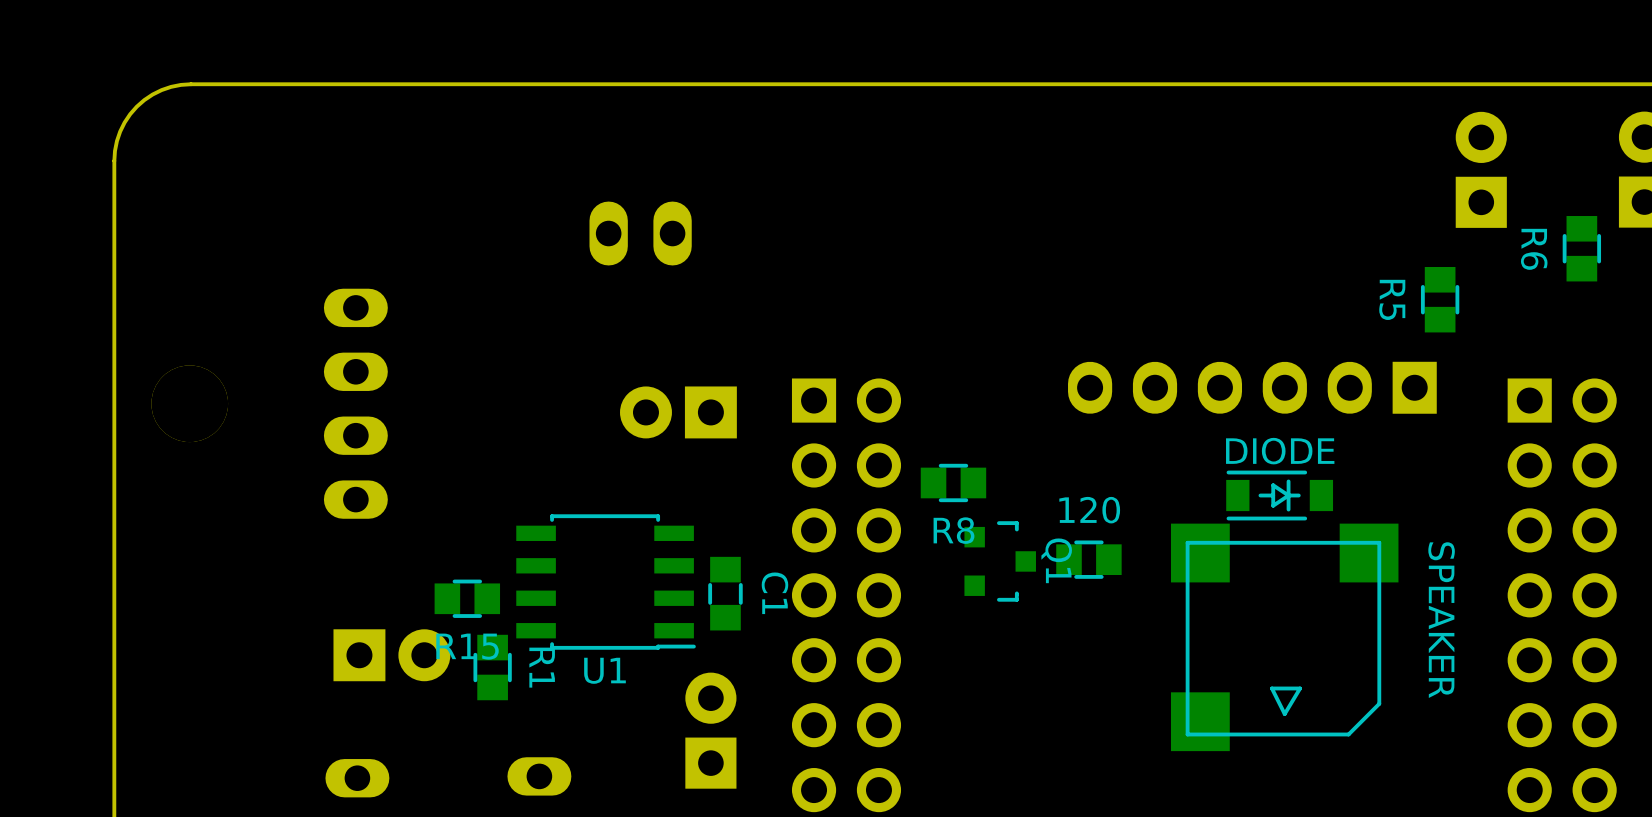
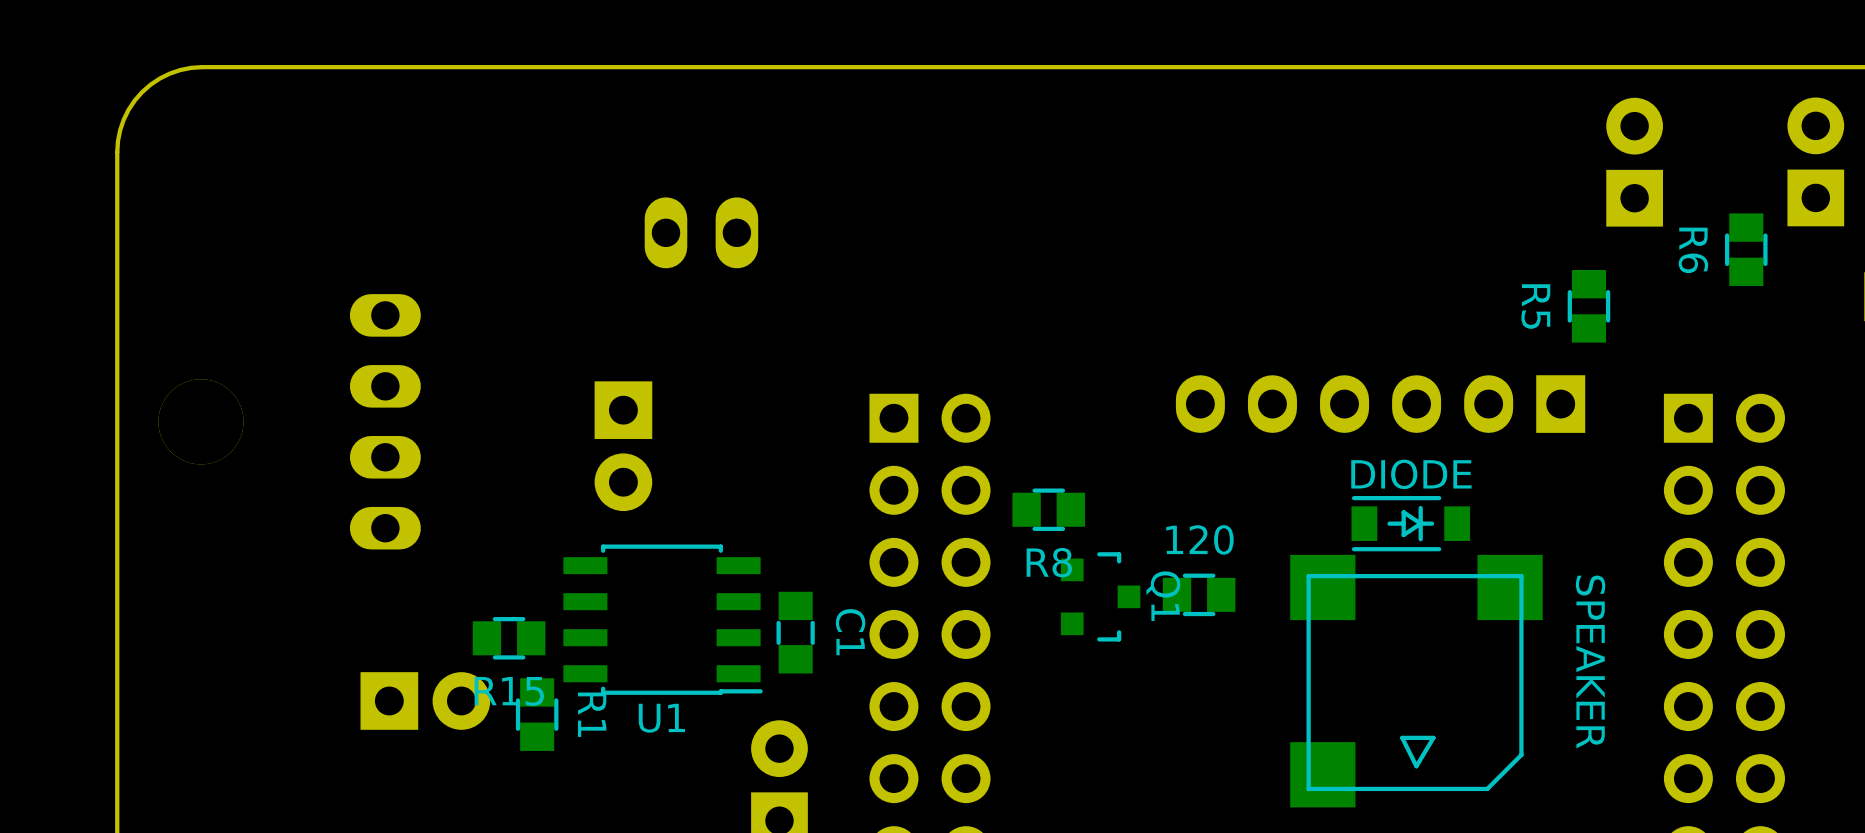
part rotation: 0° (678, 412) -> 90° counterclockwise (623, 446)
part position: (678, 412) -> (623, 446)

